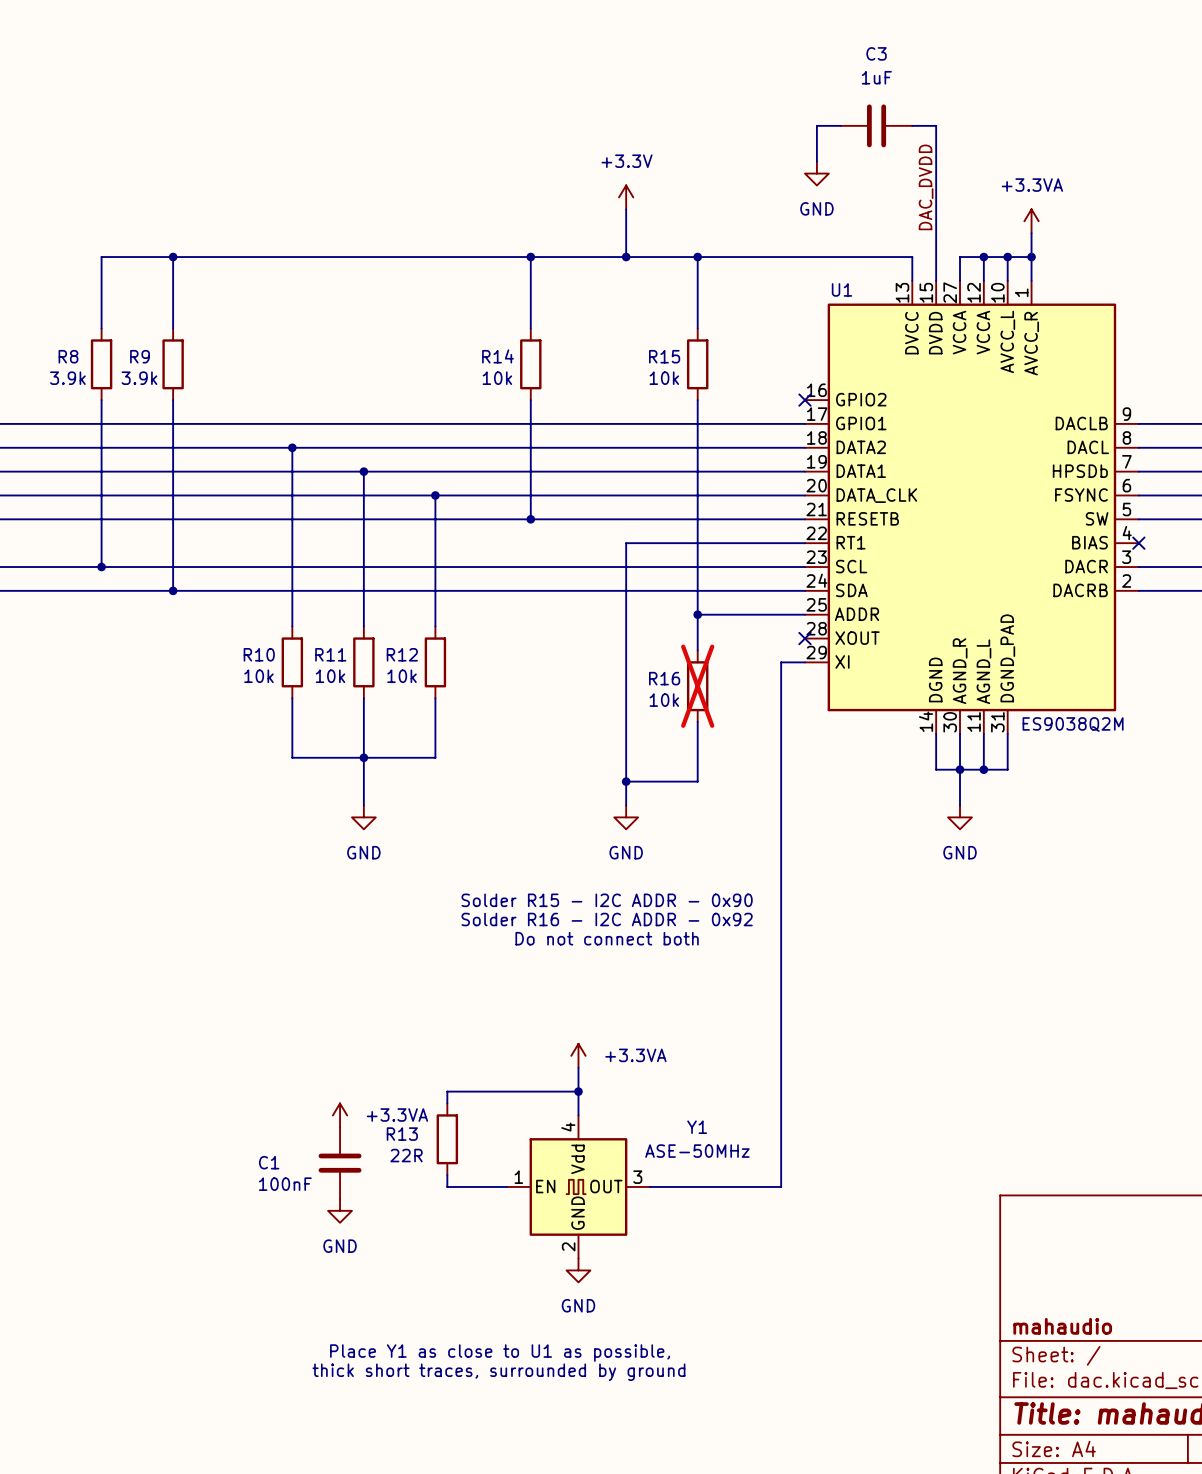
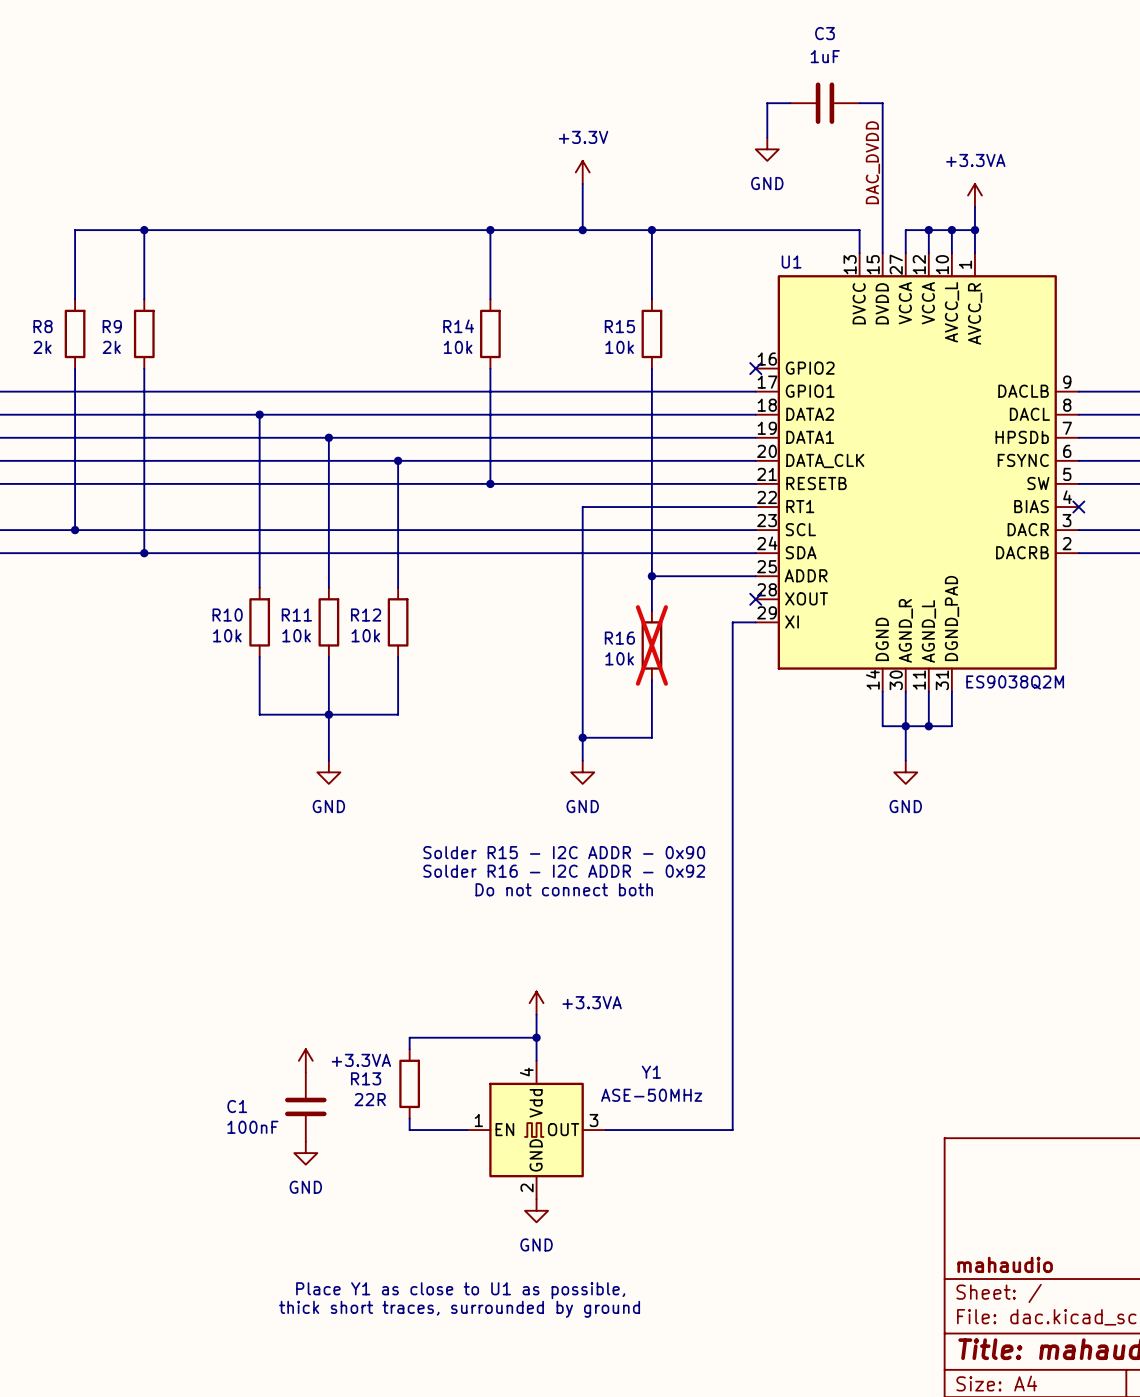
R8 value: 3.9k (67, 378) -> 2k (42, 347)
R9 value: 3.9k (139, 378) -> 2k (111, 347)

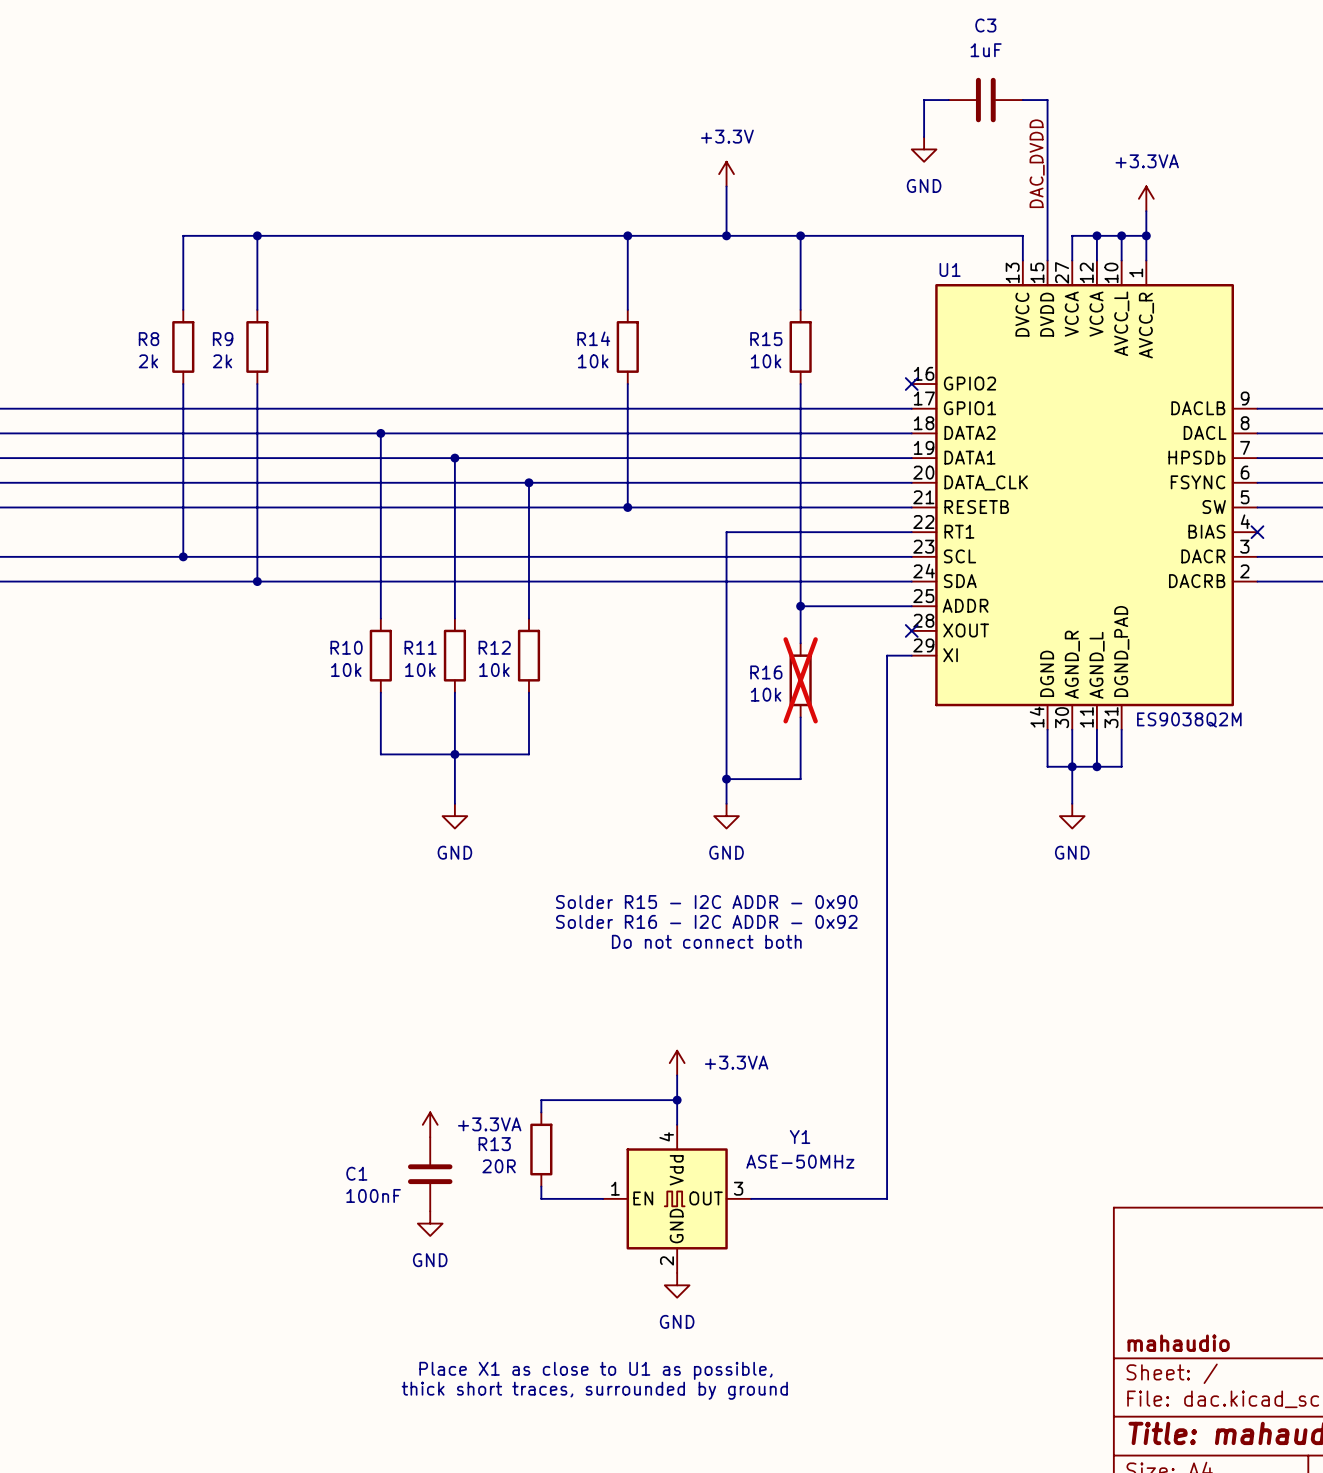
R13 value: 22R (370, 1099) -> 20R (499, 1166)
text: Place Y1 as close to U1 as possible, (460, 1290) -> Place X1 as close to U1 as possible, (595, 1370)

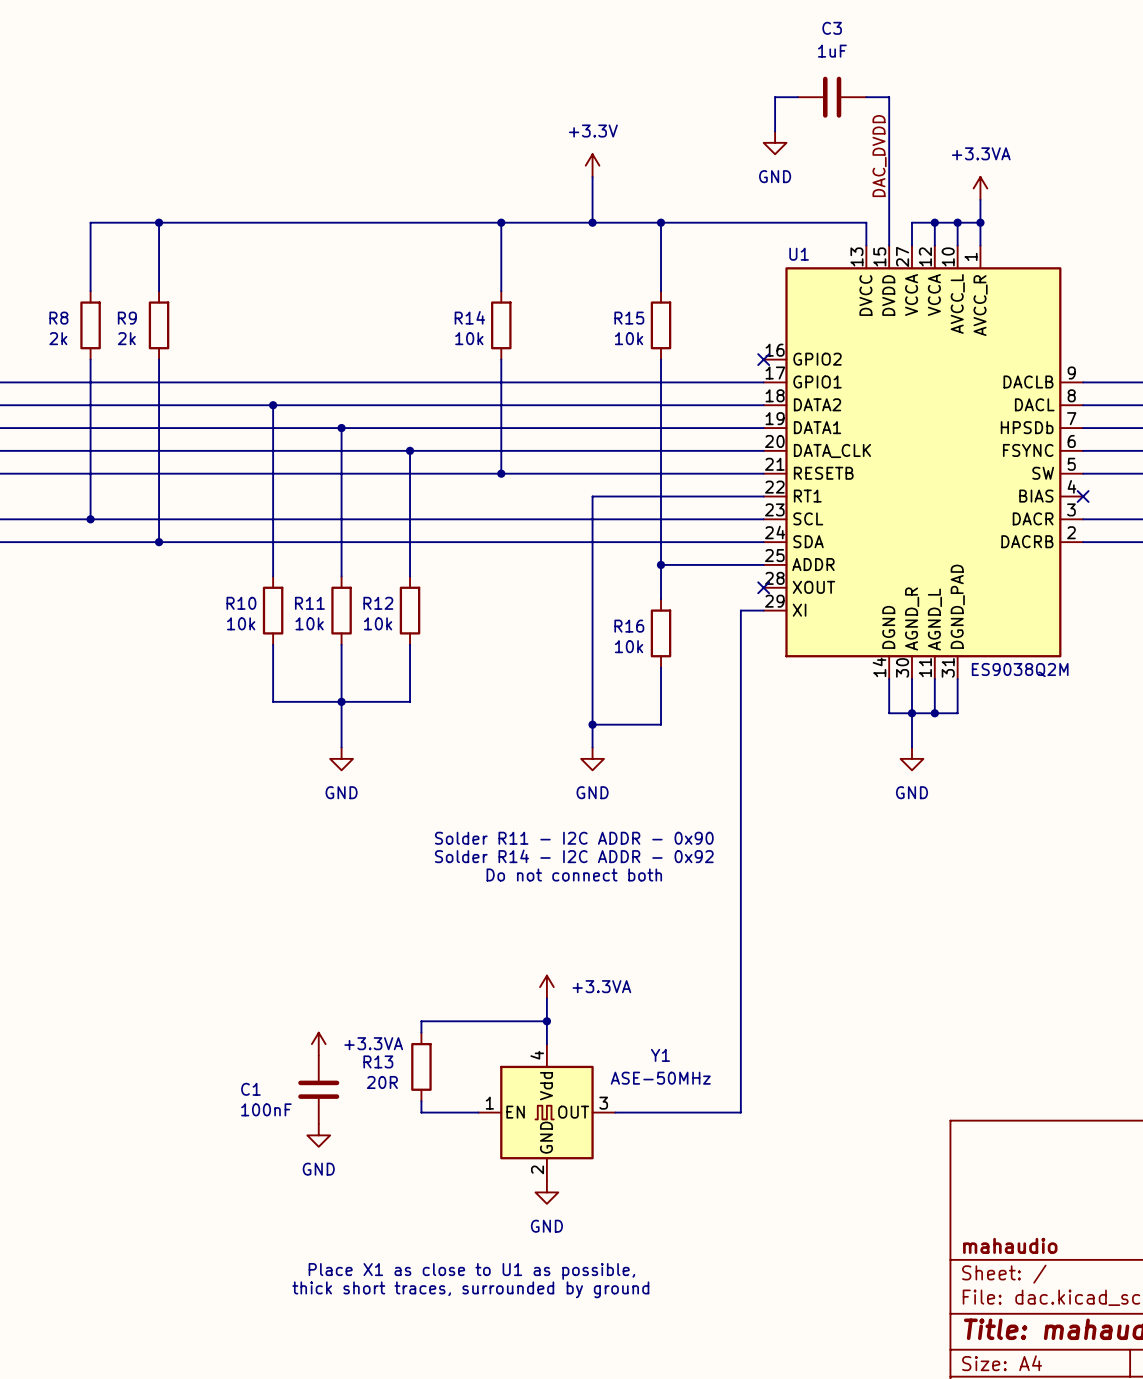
R16 do-not-place cross: (800, 680) -> none
text: Solder R15 - I2C ADDR - 0x90 (706, 902) -> Solder R11 - I2C ADDR - 0x90 (574, 838)
text: Solder R16 - I2C ADDR - 0x92 (706, 921) -> Solder R14 - I2C ADDR - 0x92 (574, 856)

